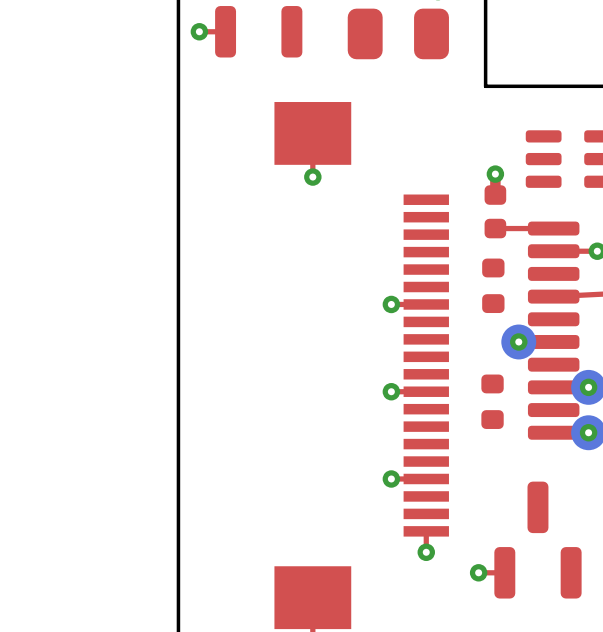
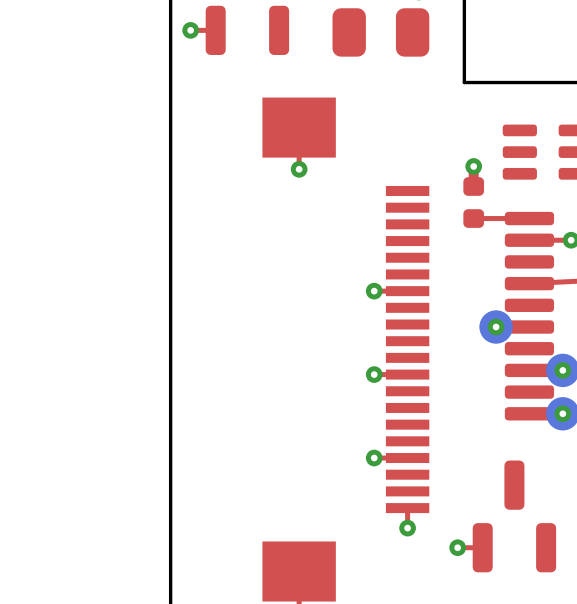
part: (493, 285) -> none
part: (492, 401) -> none

